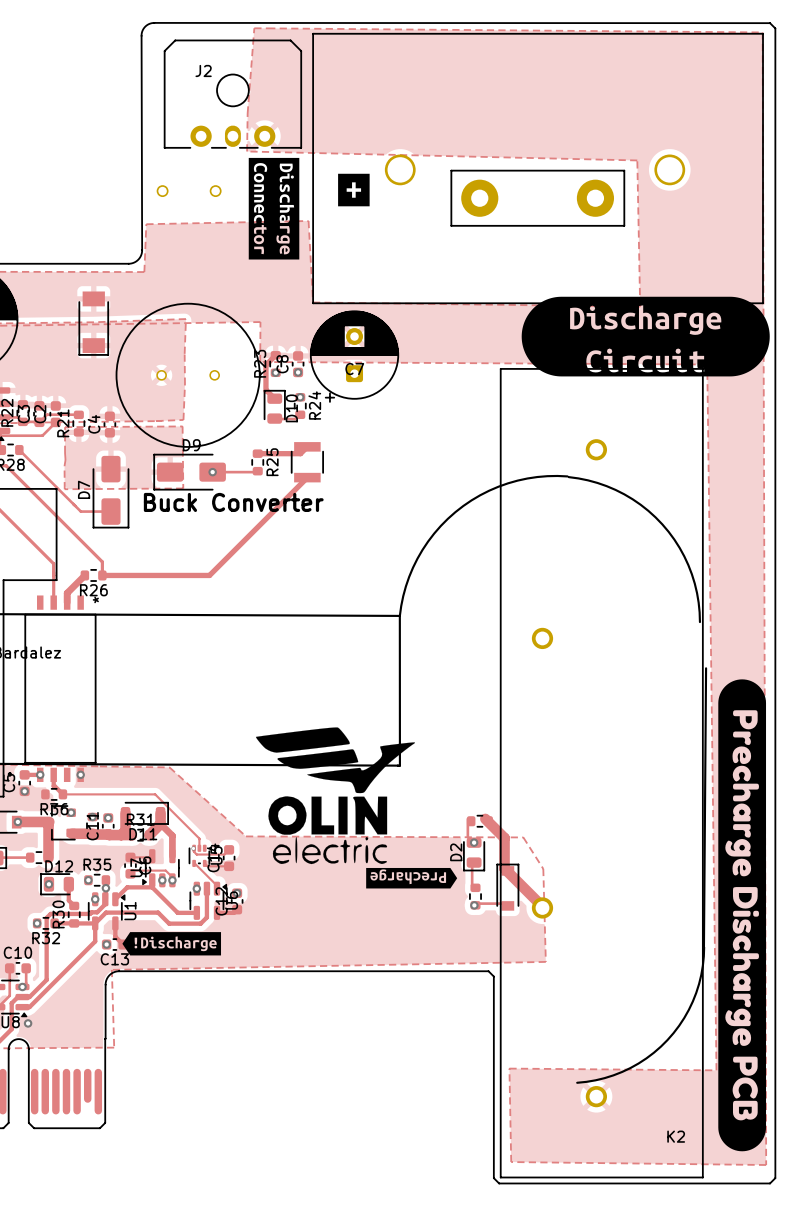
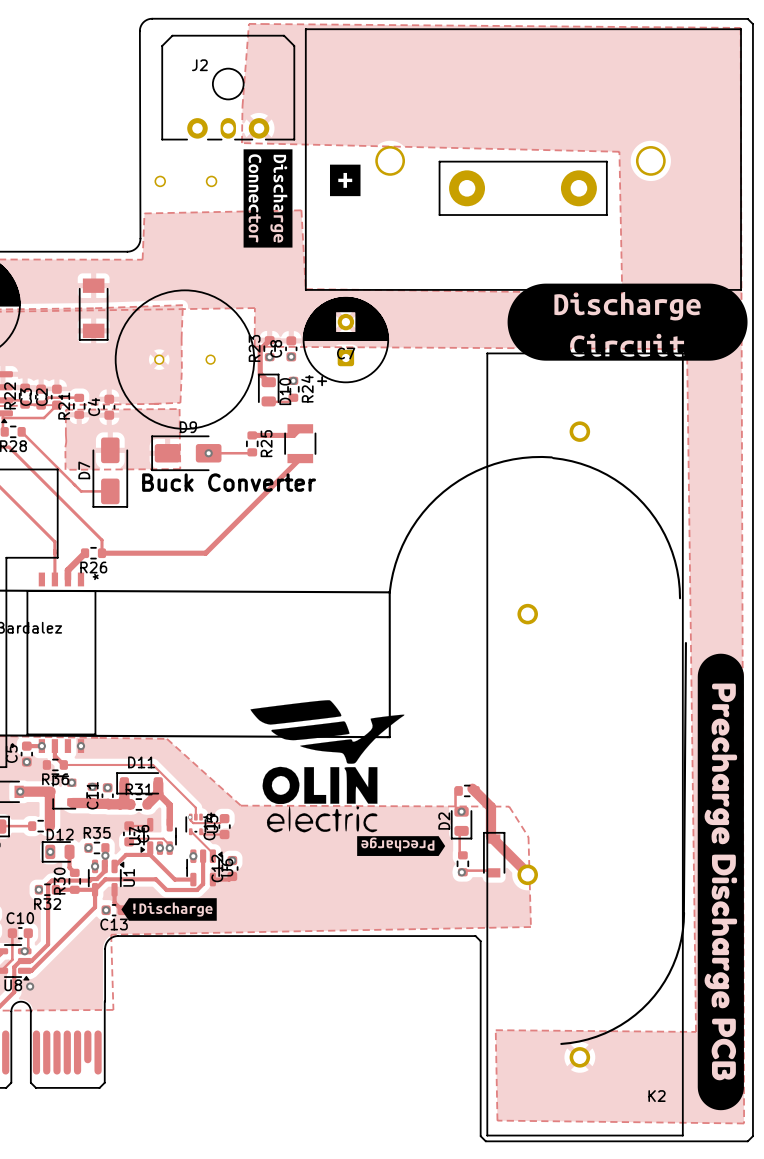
D11 rotation: 0° (144, 813) -> 180° (139, 783)

